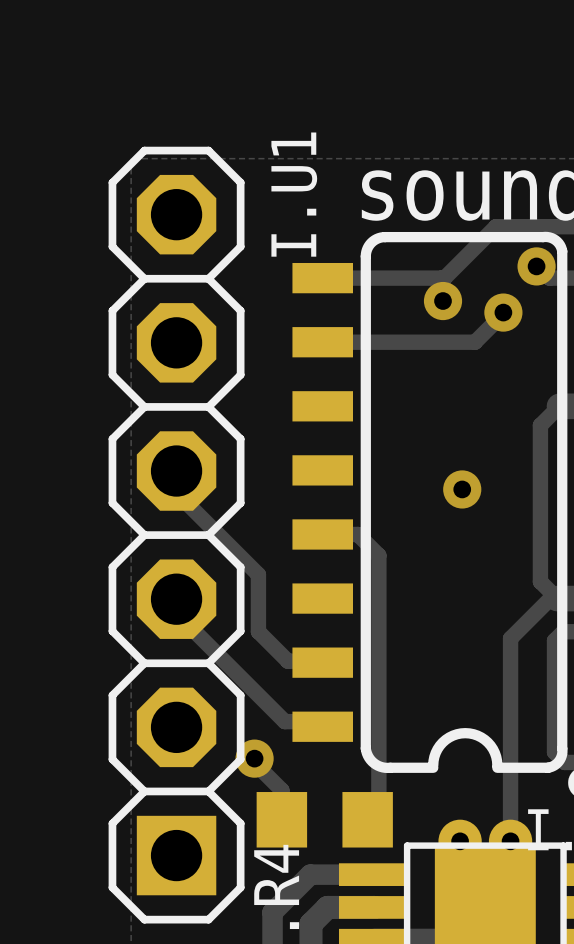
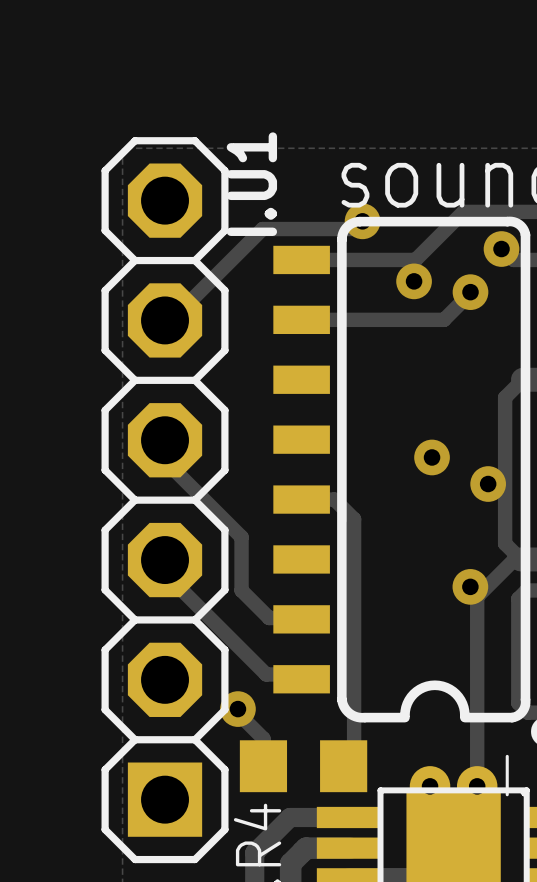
I.U1 name position: I.U1 (294, 194) -> I.U1 (251, 184)
track: none -> (362, 221) (354, 229) (262, 229) (171, 320) (165, 320)
via: none -> (362, 221)
via: none -> (488, 484)
via: none -> (470, 586)

